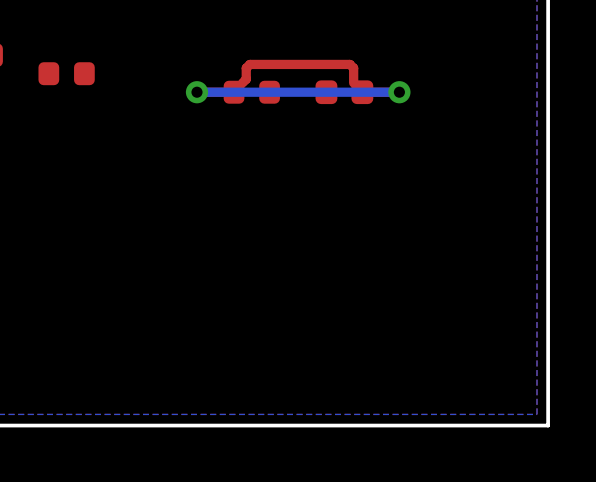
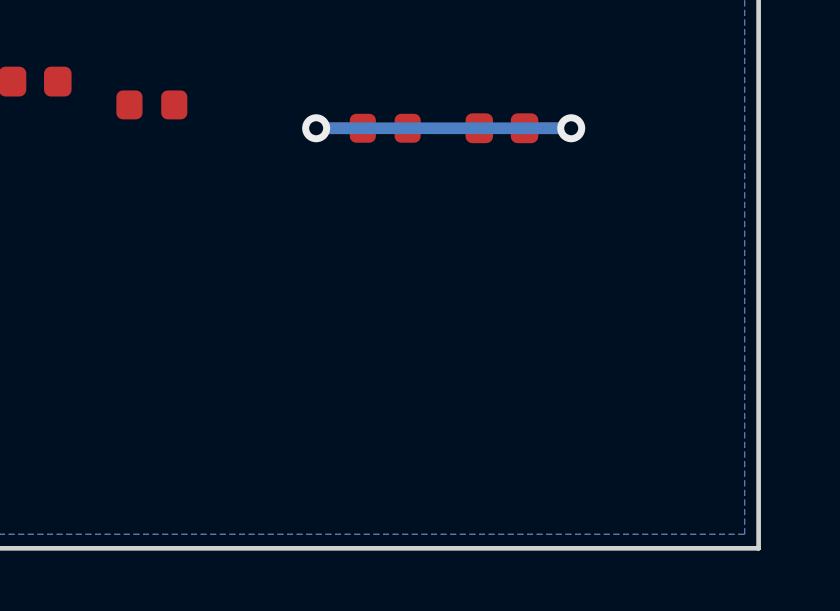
top track: (353, 82) (353, 68) (349, 64) (249, 64) (246, 68) (246, 79) (242, 82) -> none

